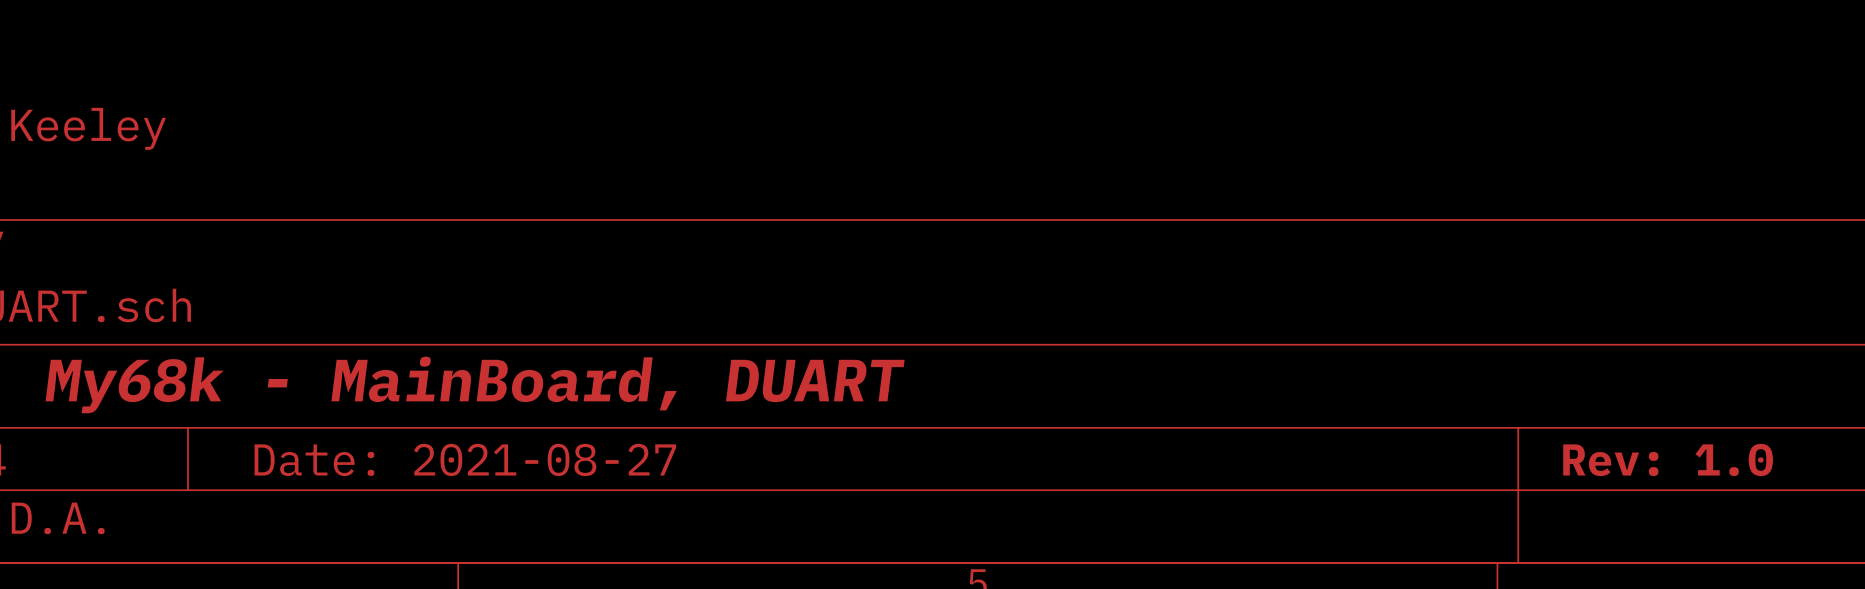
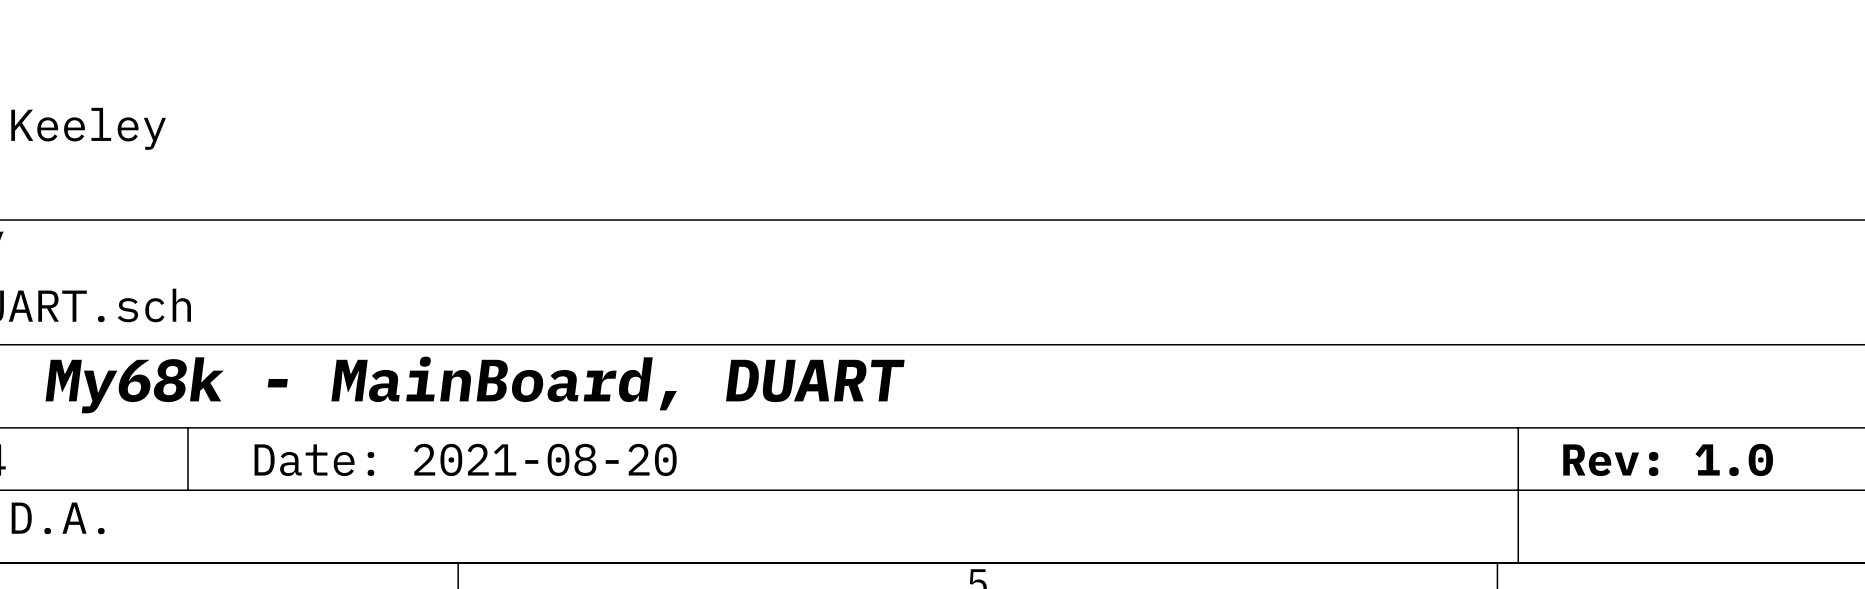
title block: Date: 2021-08-27 (465, 459) -> Date: 2021-08-20 (465, 459)

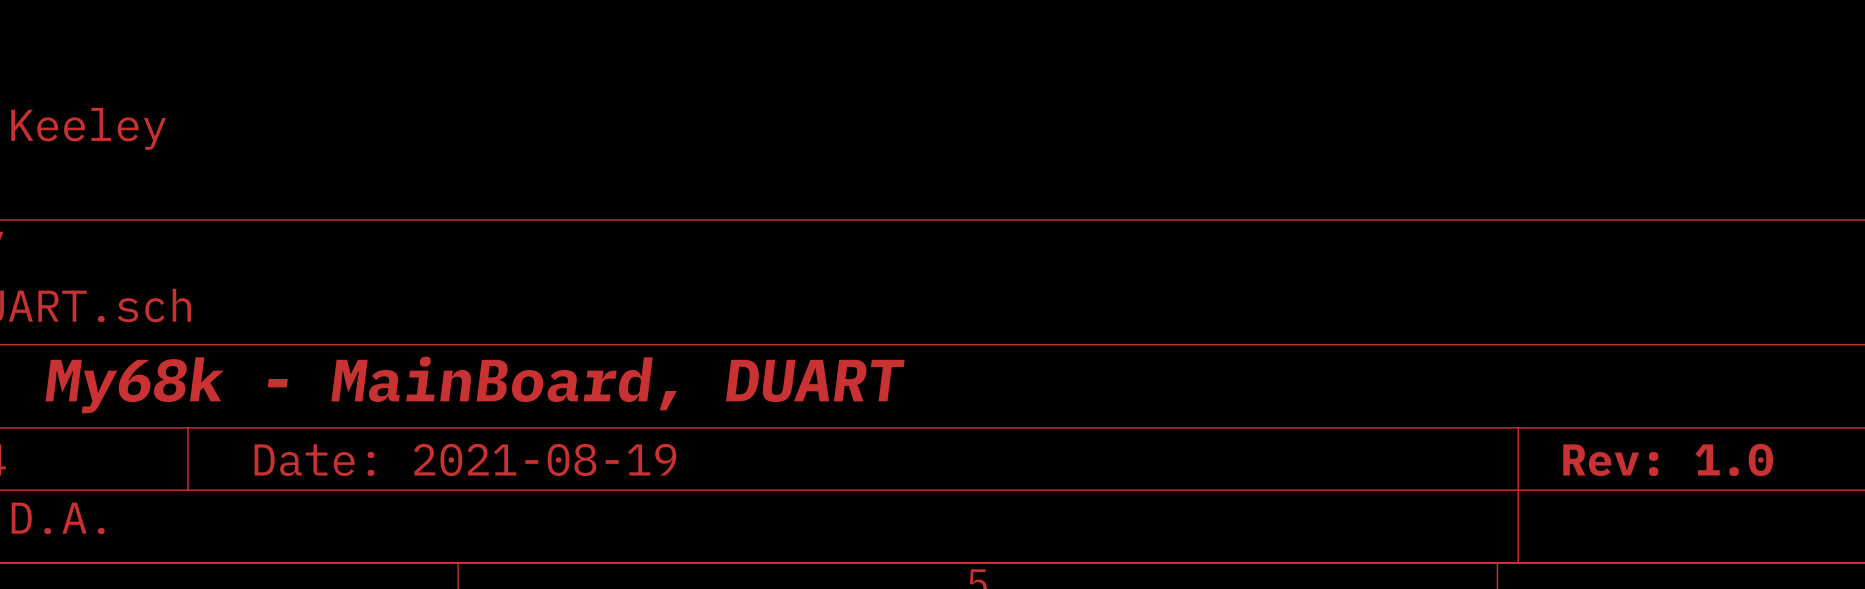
title block: Date: 2021-08-20 (465, 459) -> Date: 2021-08-19 (465, 459)

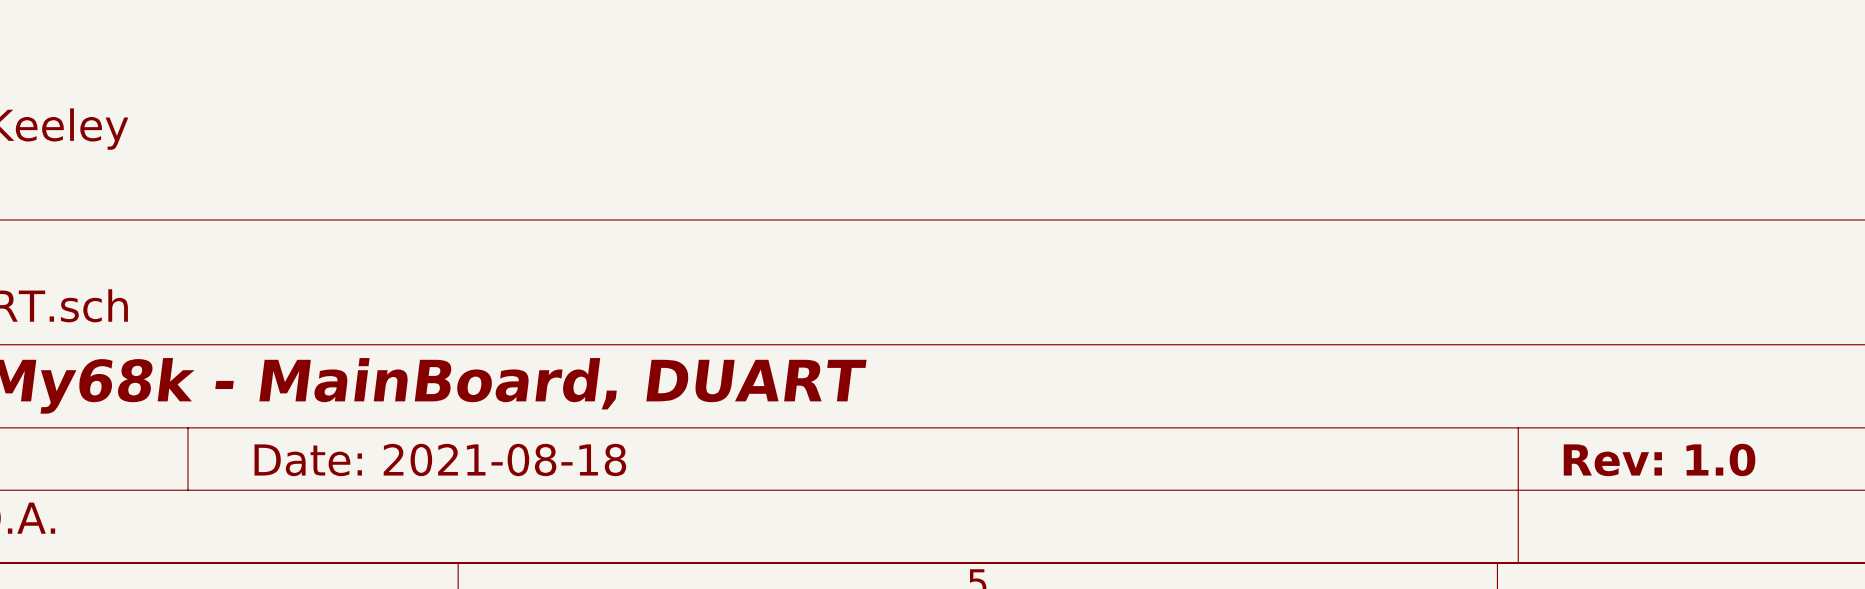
title block: Date: 2021-08-19 (465, 459) -> Date: 2021-08-18 (440, 459)

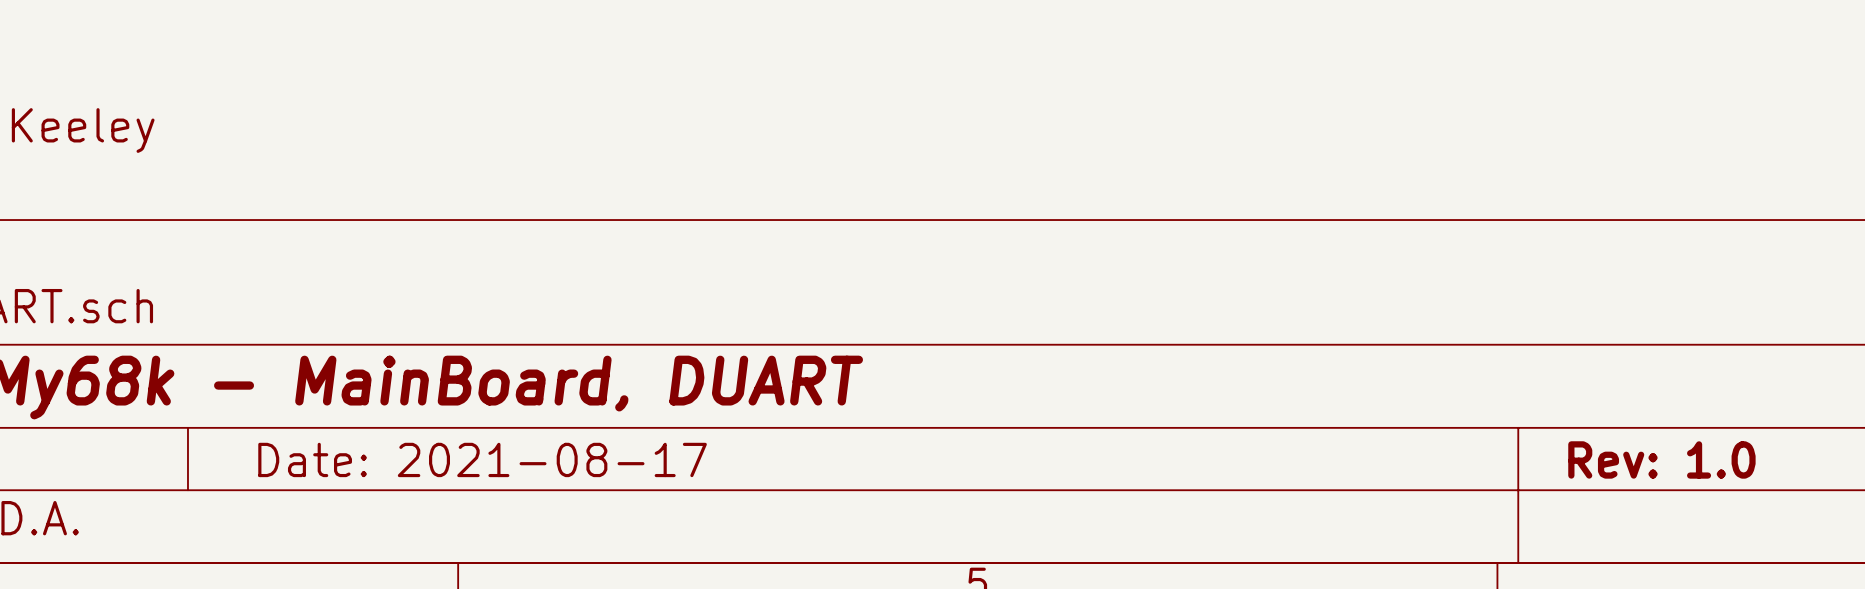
title block: Date: 2021-08-18 (440, 459) -> Date: 2021-08-17 (482, 459)

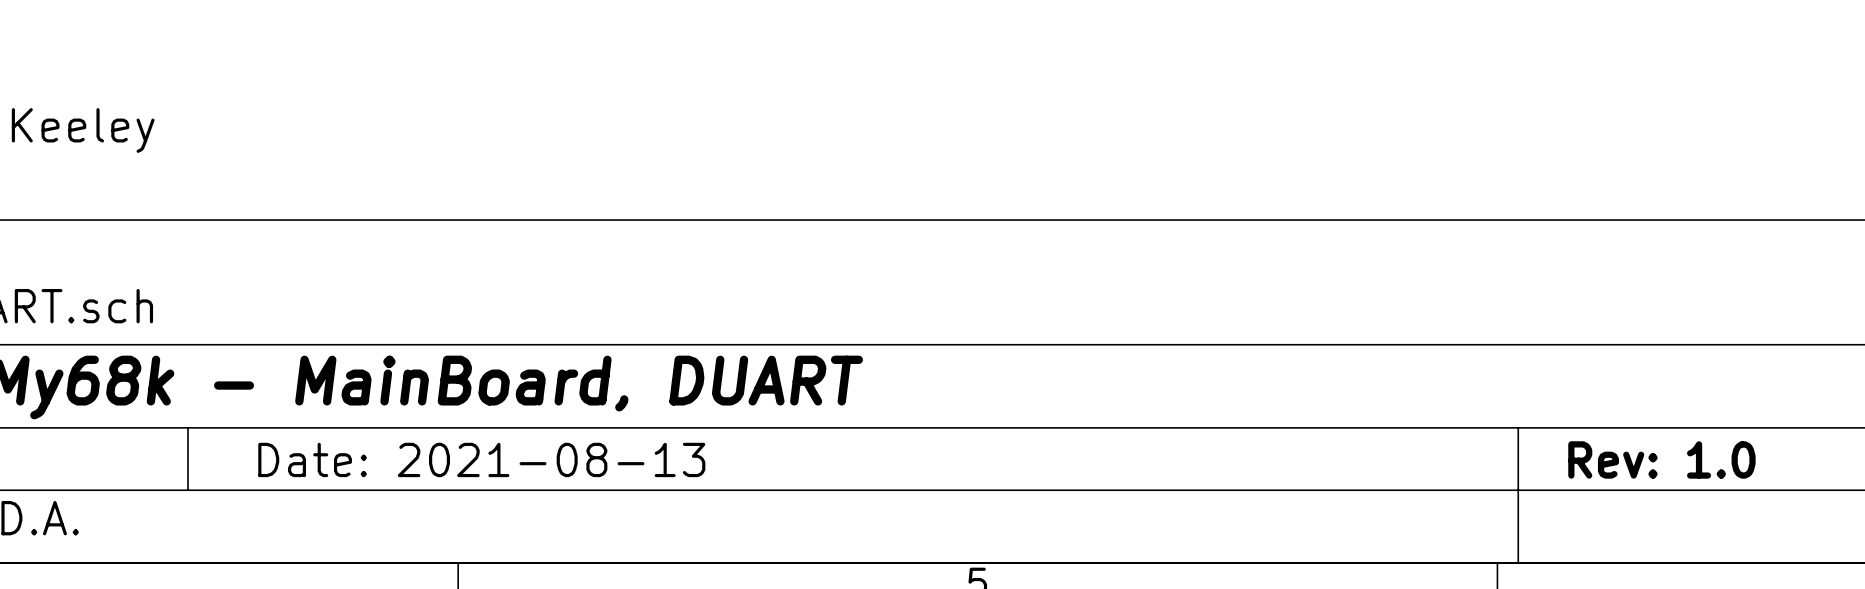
title block: Date: 2021-08-17 (482, 459) -> Date: 2021-08-13 (481, 459)

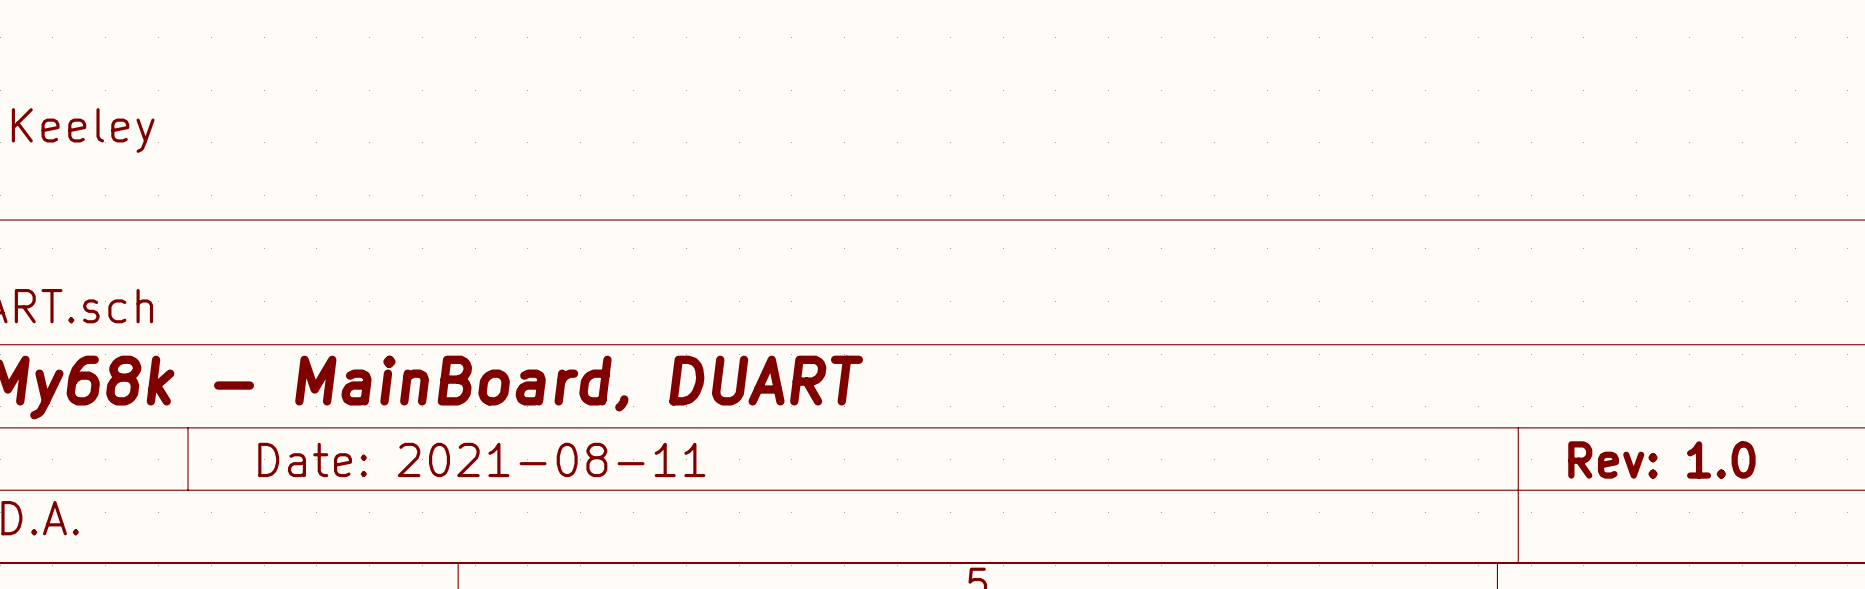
title block: Date: 2021-08-13 (481, 459) -> Date: 2021-08-11 (481, 459)

